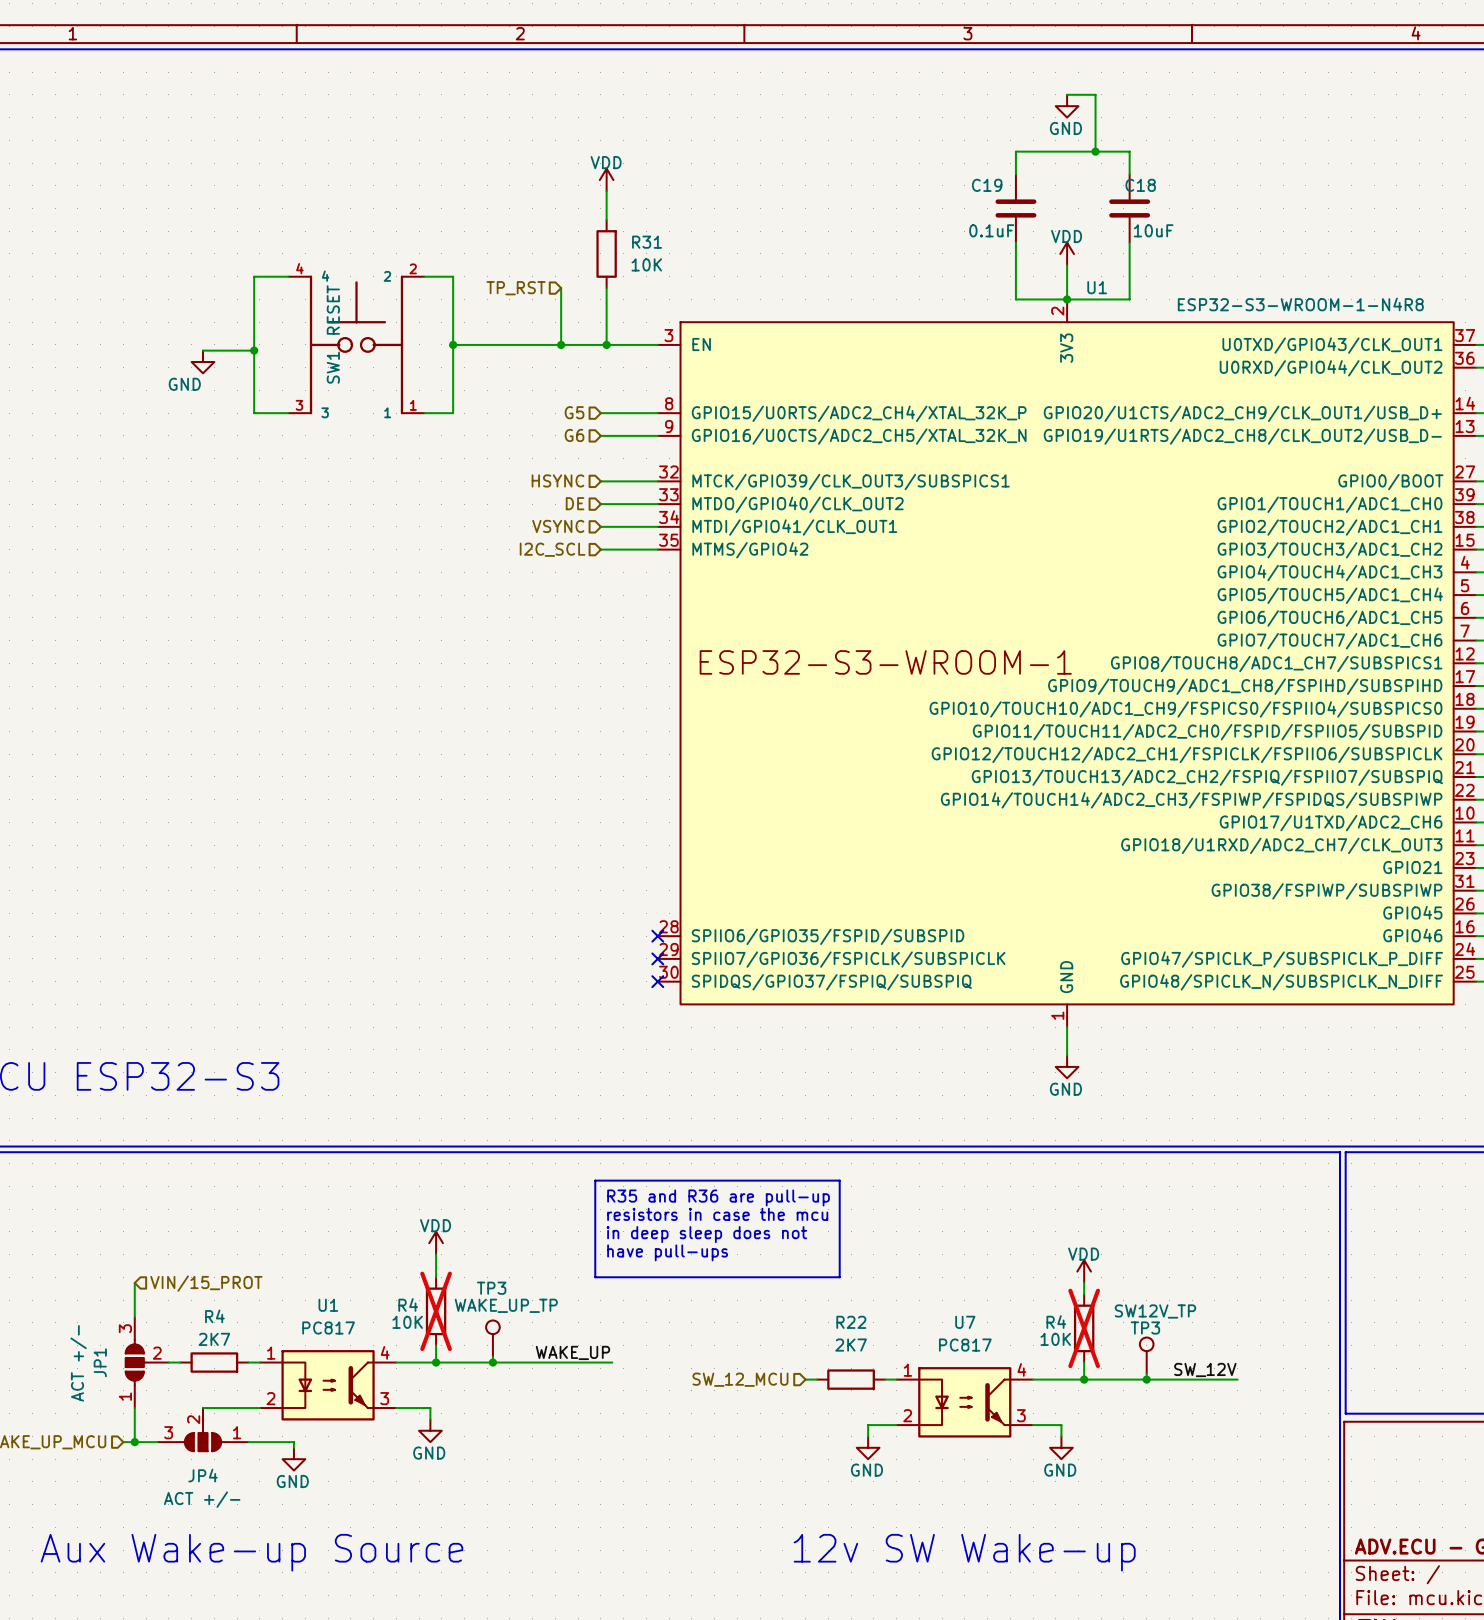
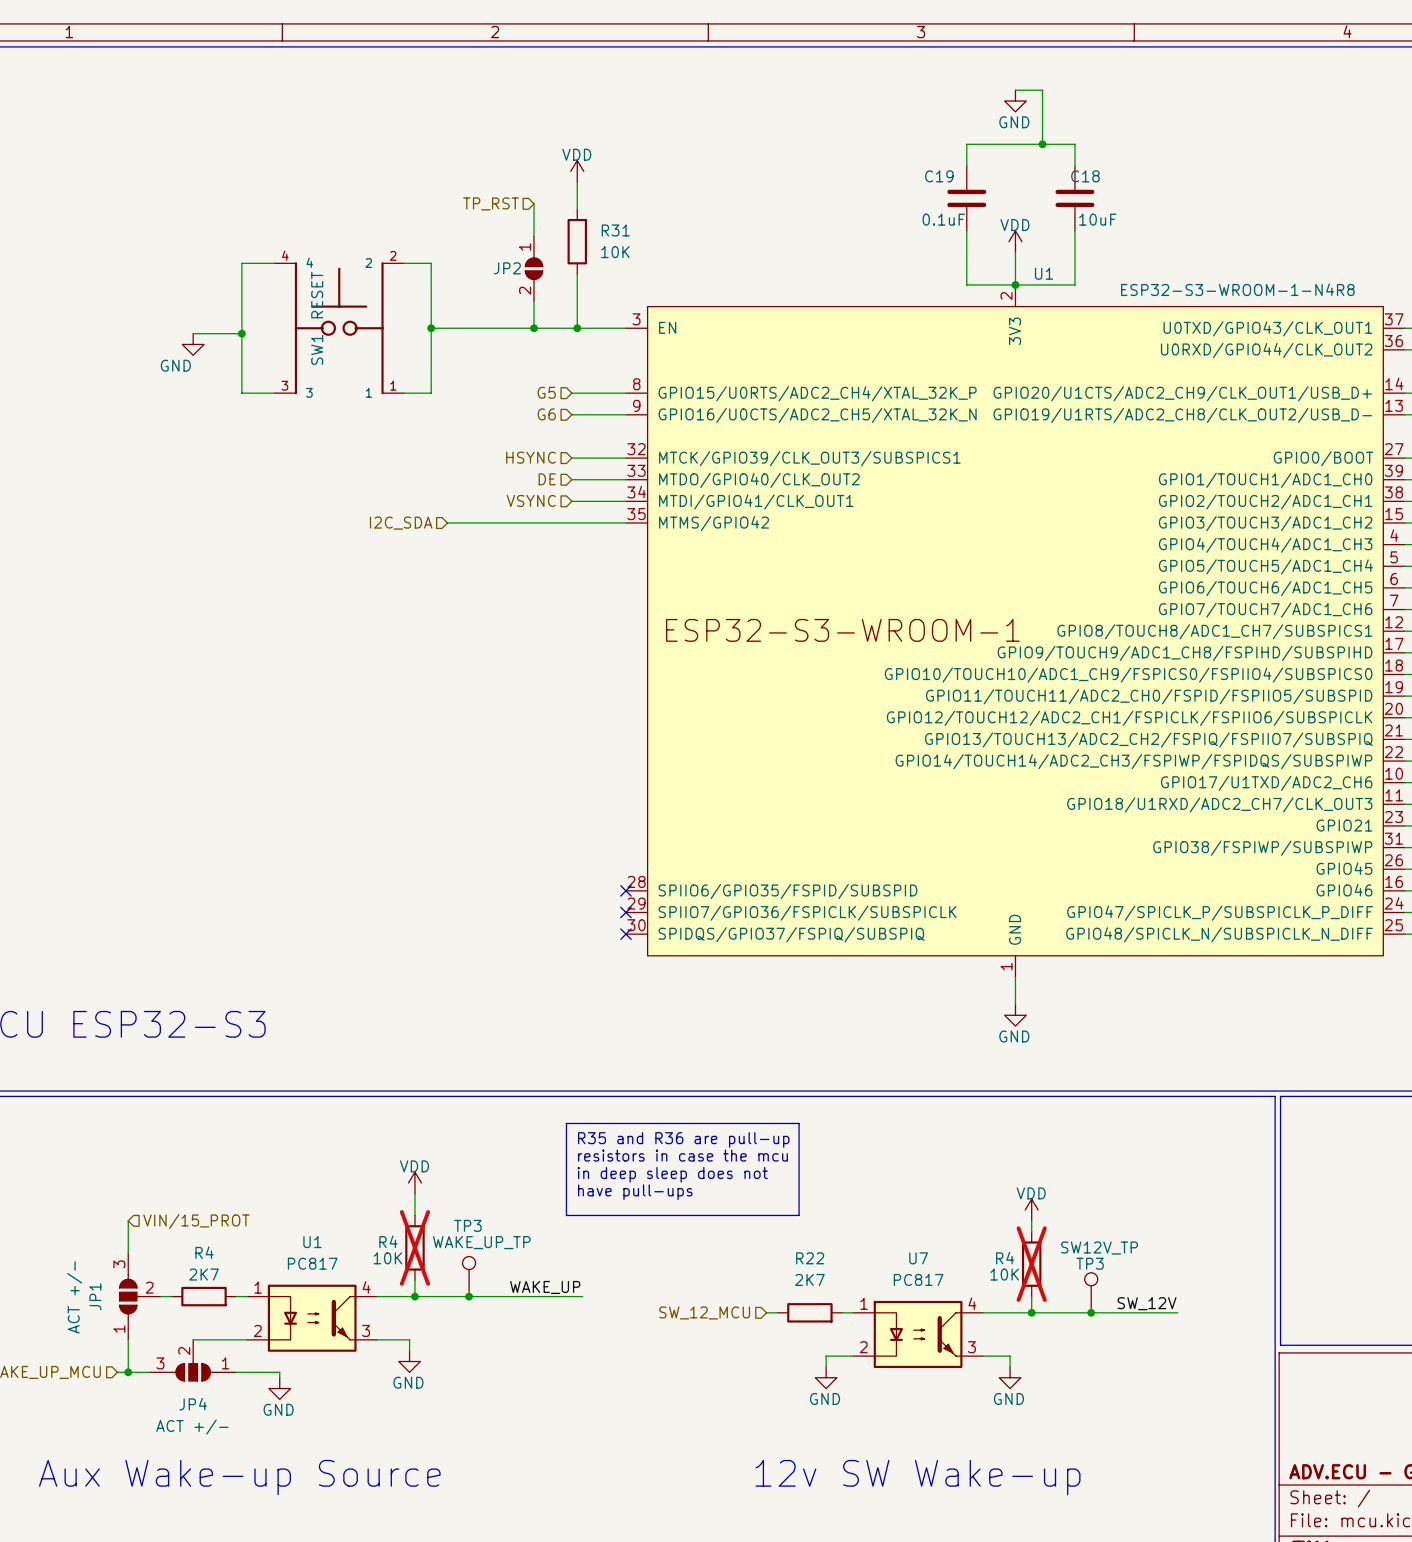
wire: none -> (533, 203) (533, 236)
JP2: none -> (533, 268)
hierarchical label position: TP_RST (516, 288) -> TP_RST (491, 203)
hierarchical label: none -> I2C_SDA (401, 523)
wire: none -> (447, 523) (571, 523)
hierarchical label: I2C_SCL (552, 549) -> none

